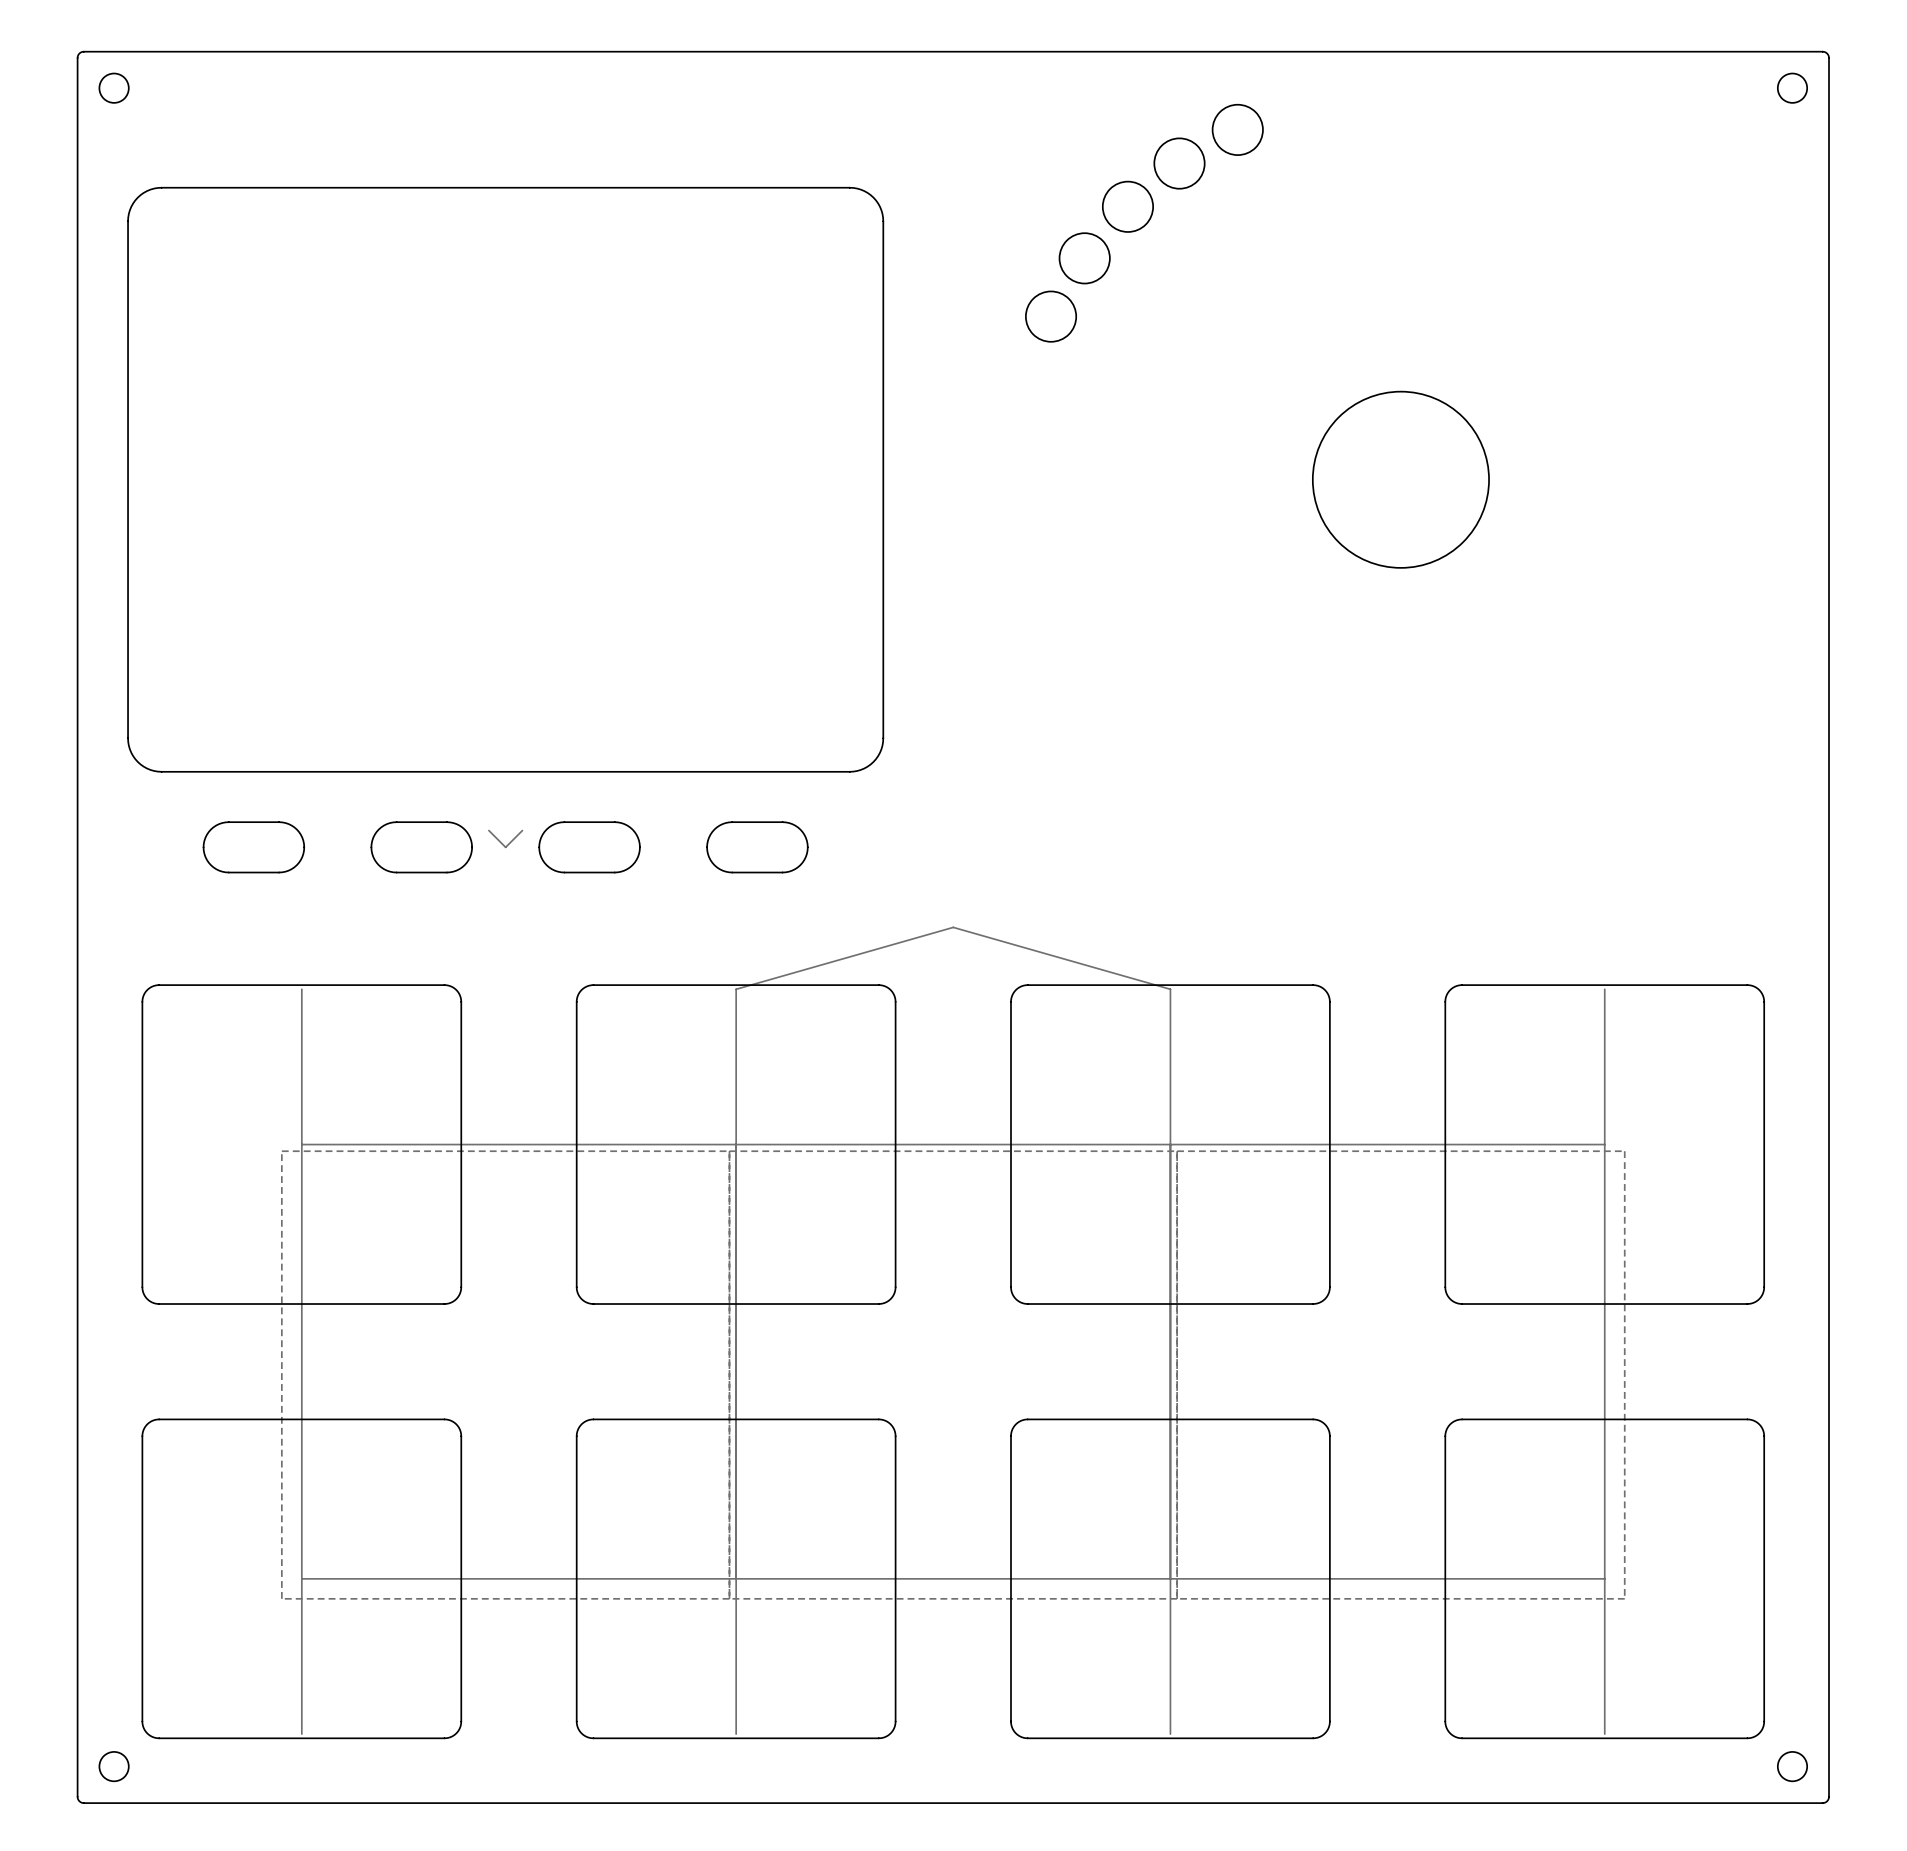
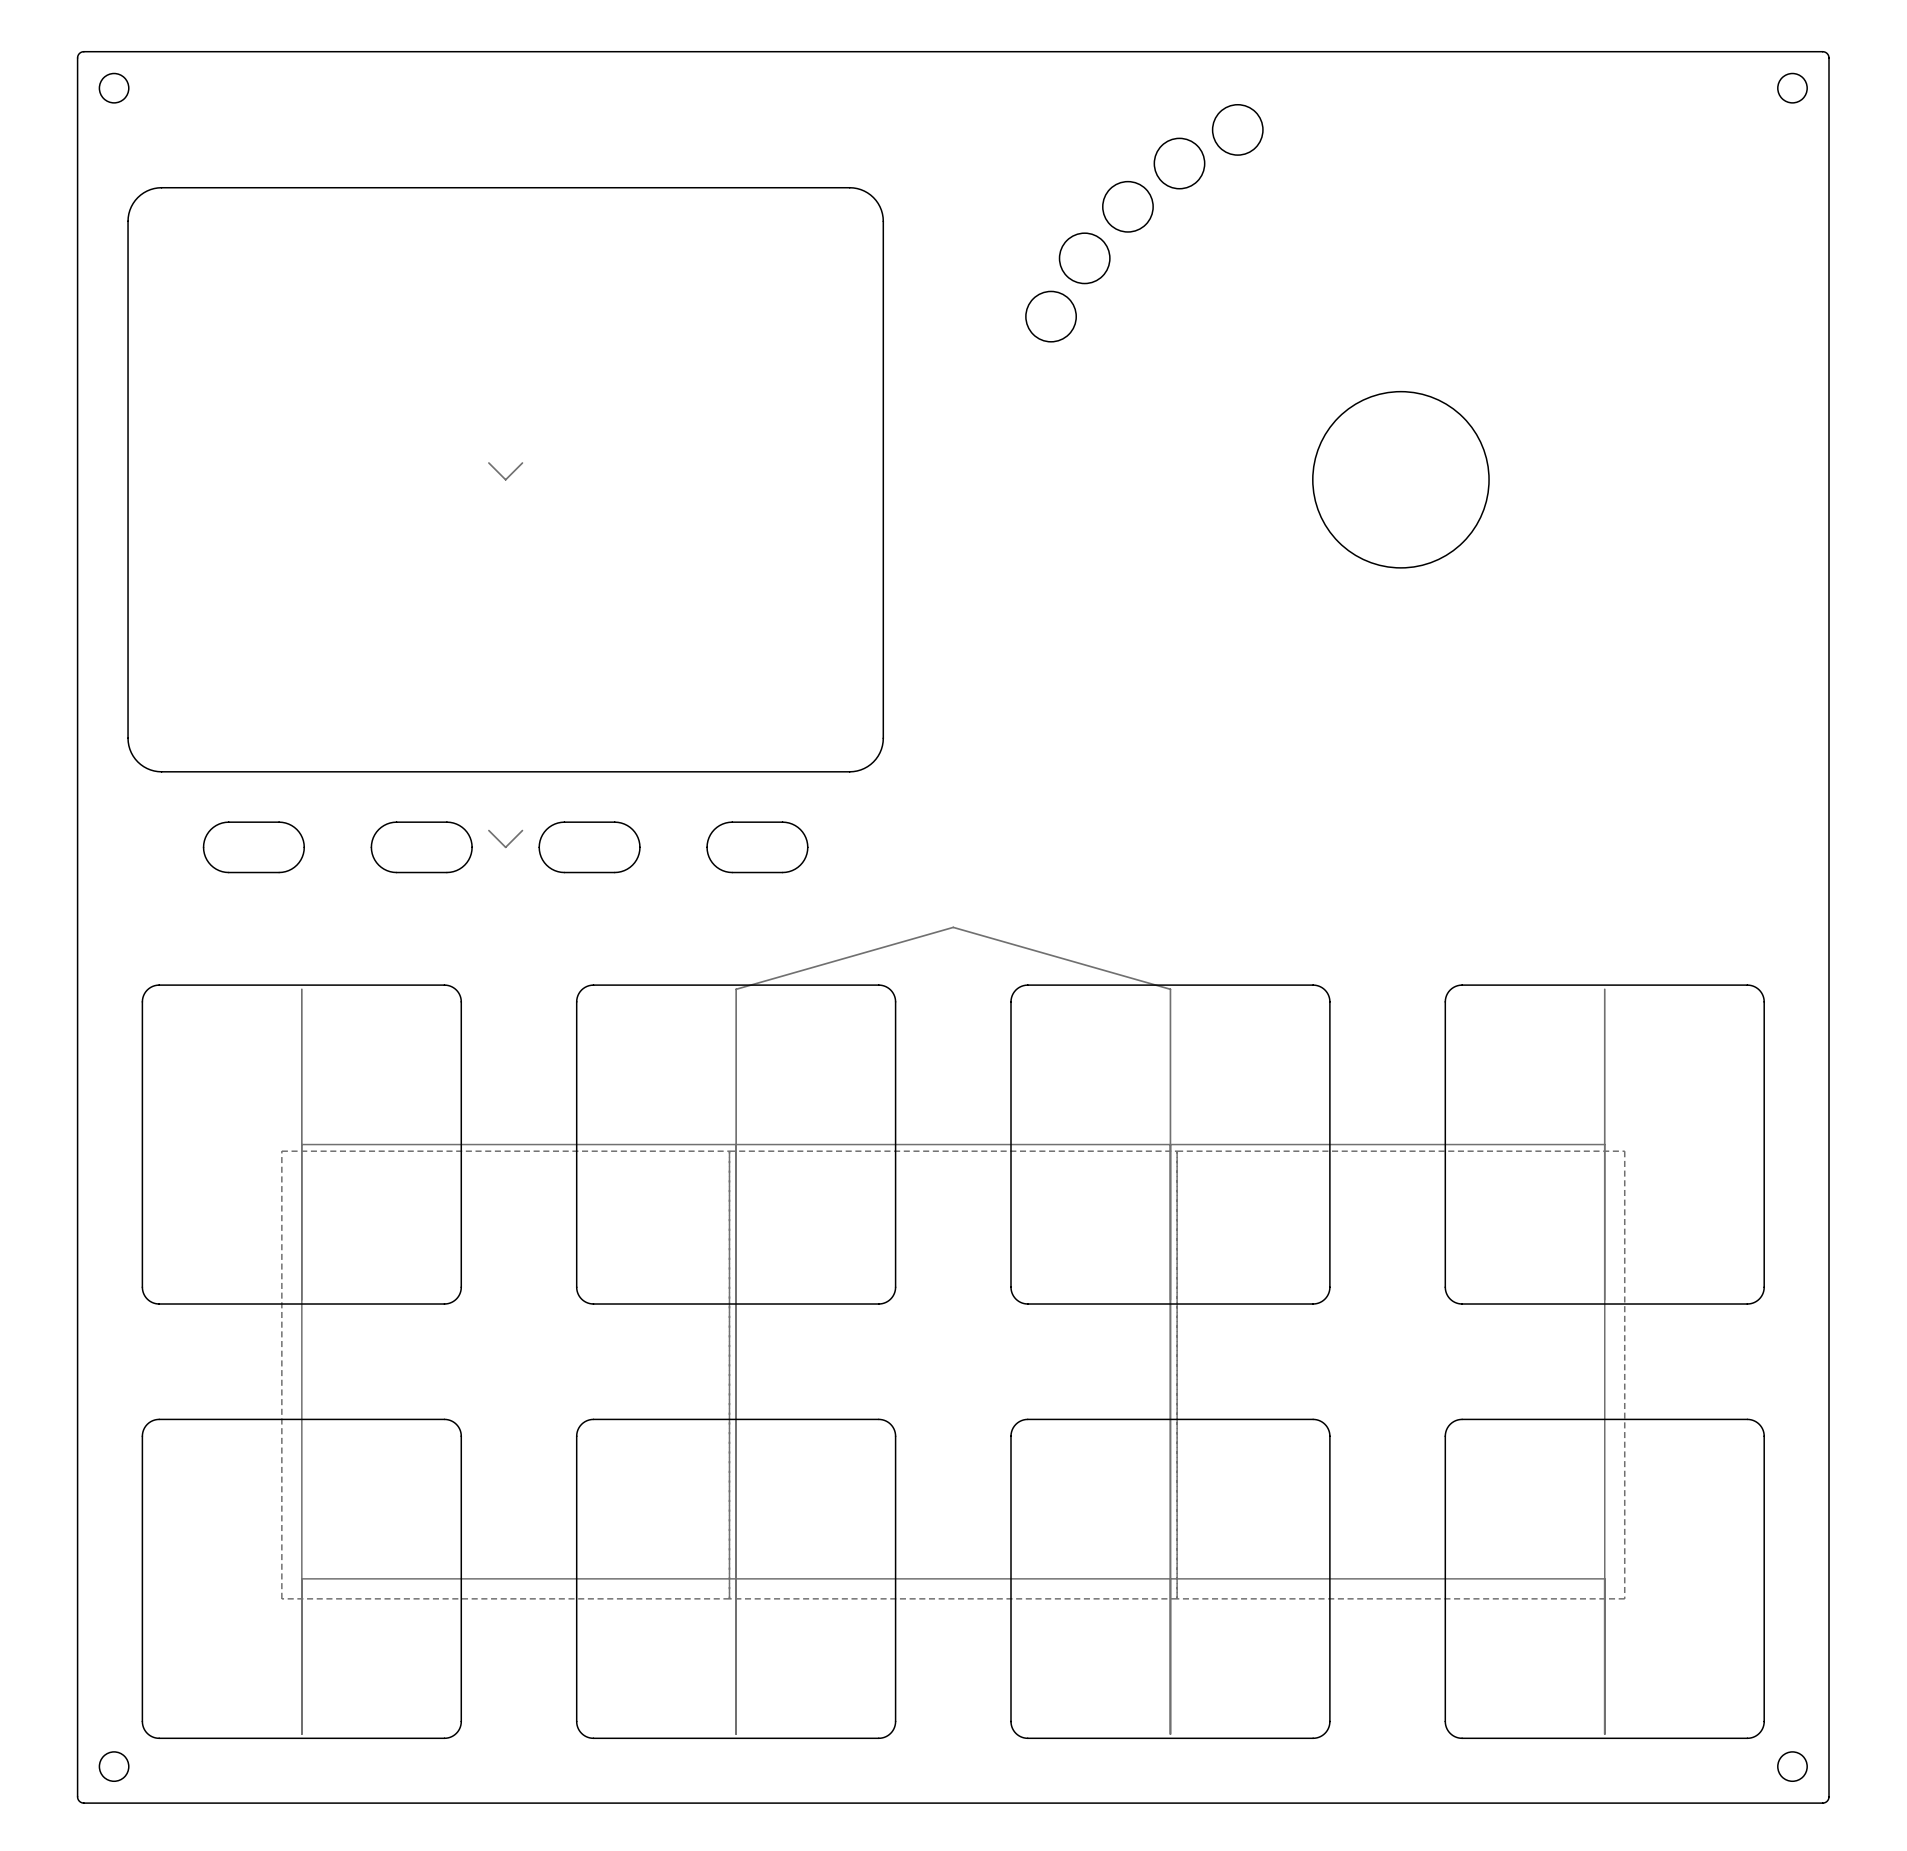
drawing: none -> [77, 51, 1830, 1804]

